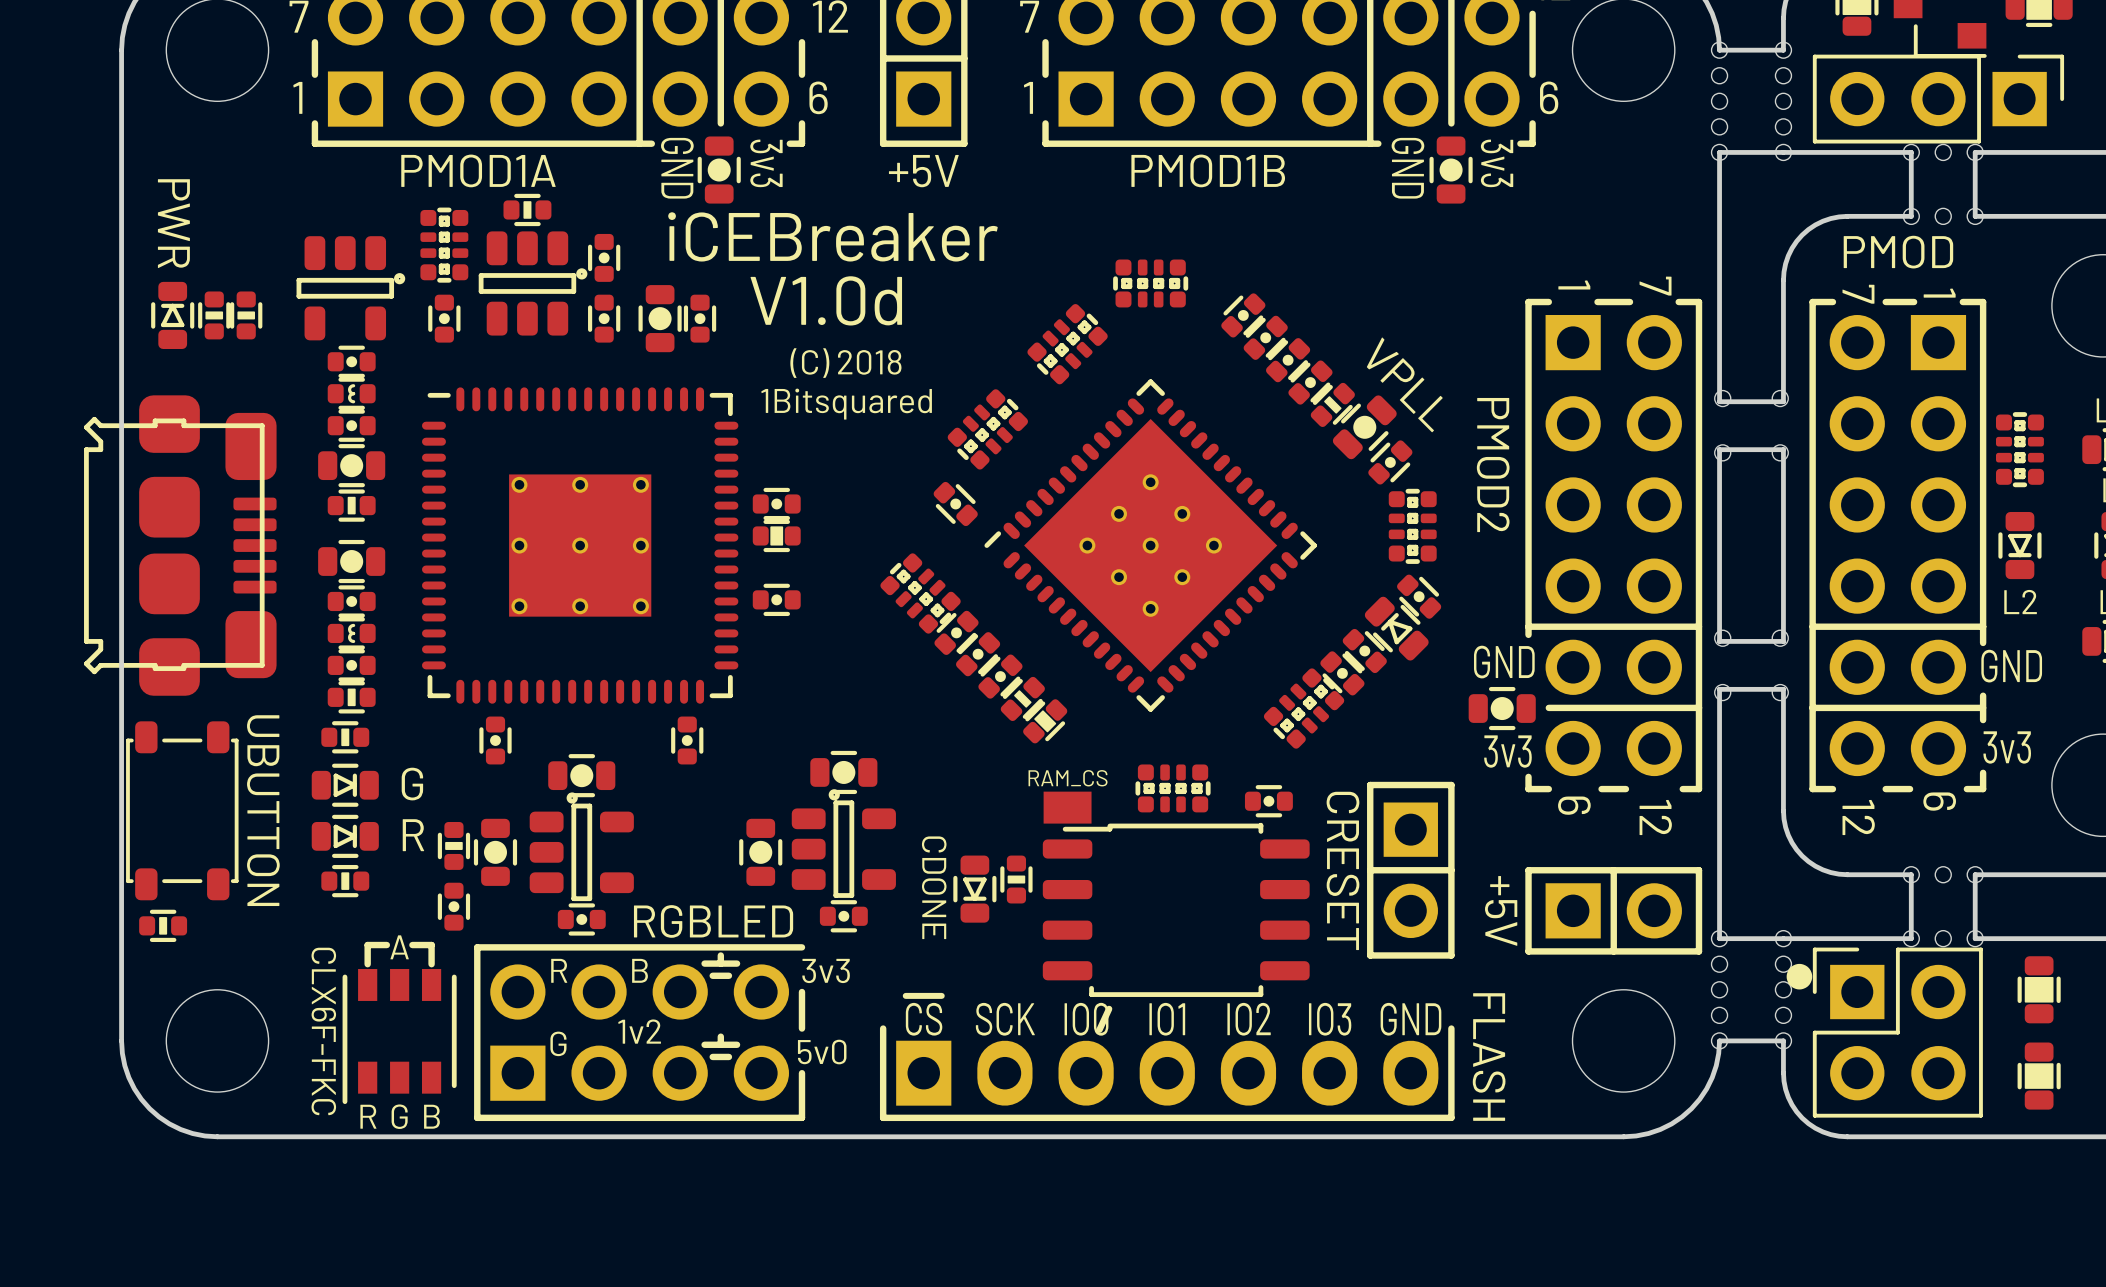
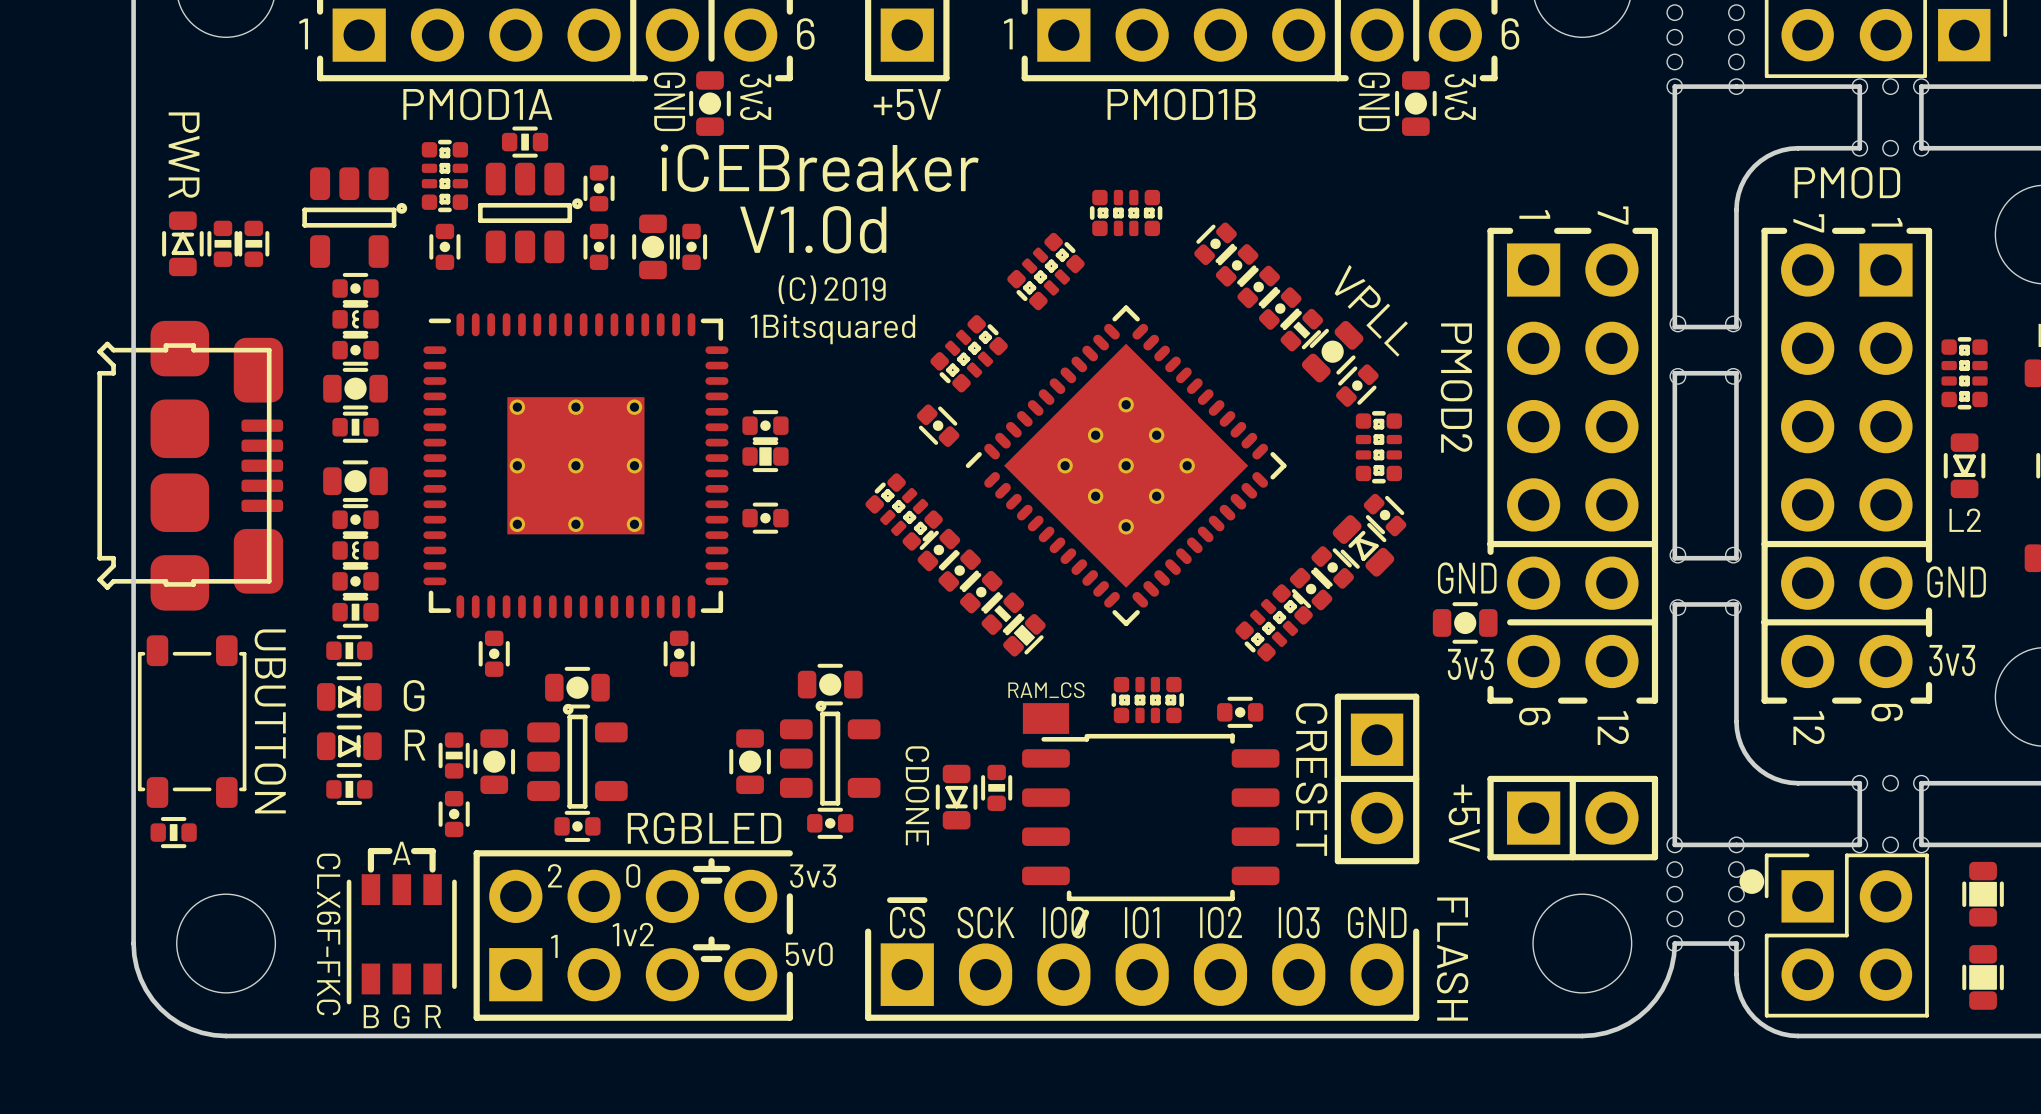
text: (C) 2018 (845, 363) -> (C) 2019 (832, 289)
text: R (559, 970) -> 2 (554, 875)
text: B (640, 970) -> 0 (633, 875)
text: G (558, 1043) -> 1 (554, 946)
text: R (368, 1116) -> B (371, 1016)
text: B (431, 1116) -> R (433, 1016)

